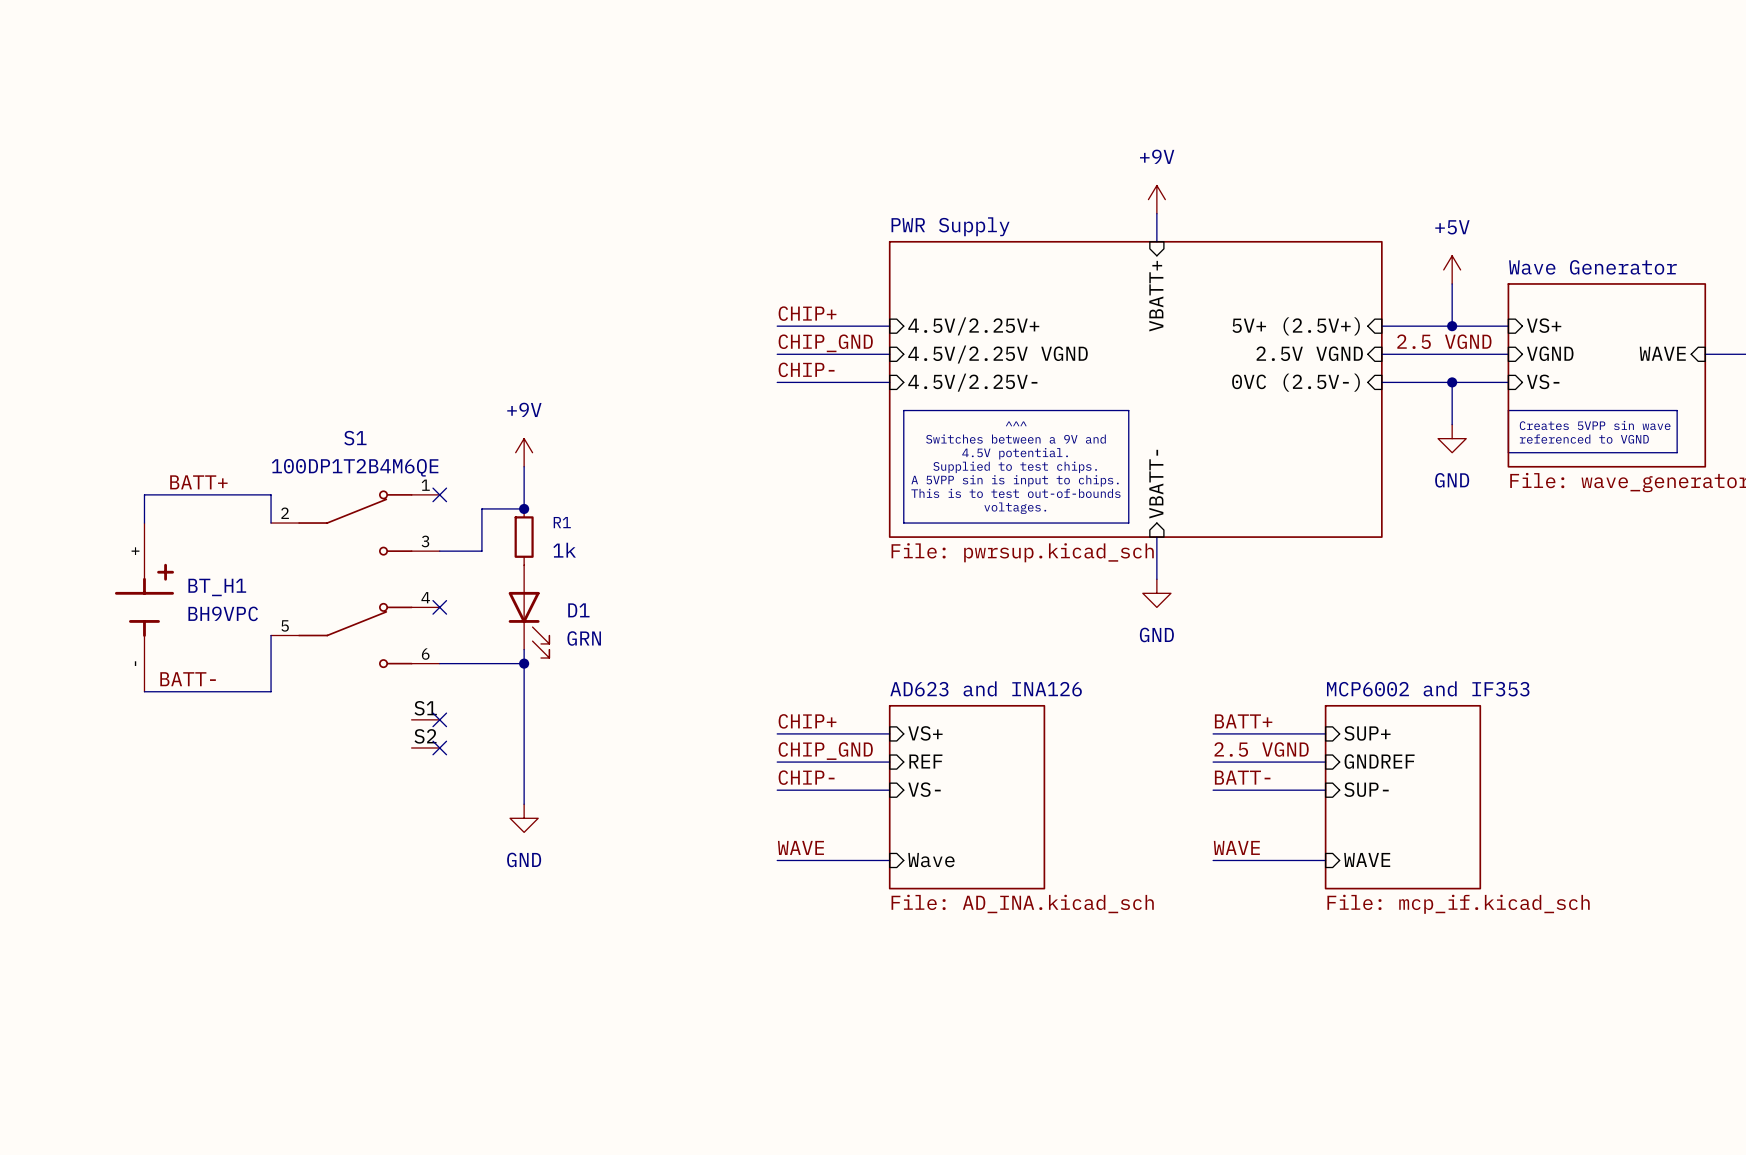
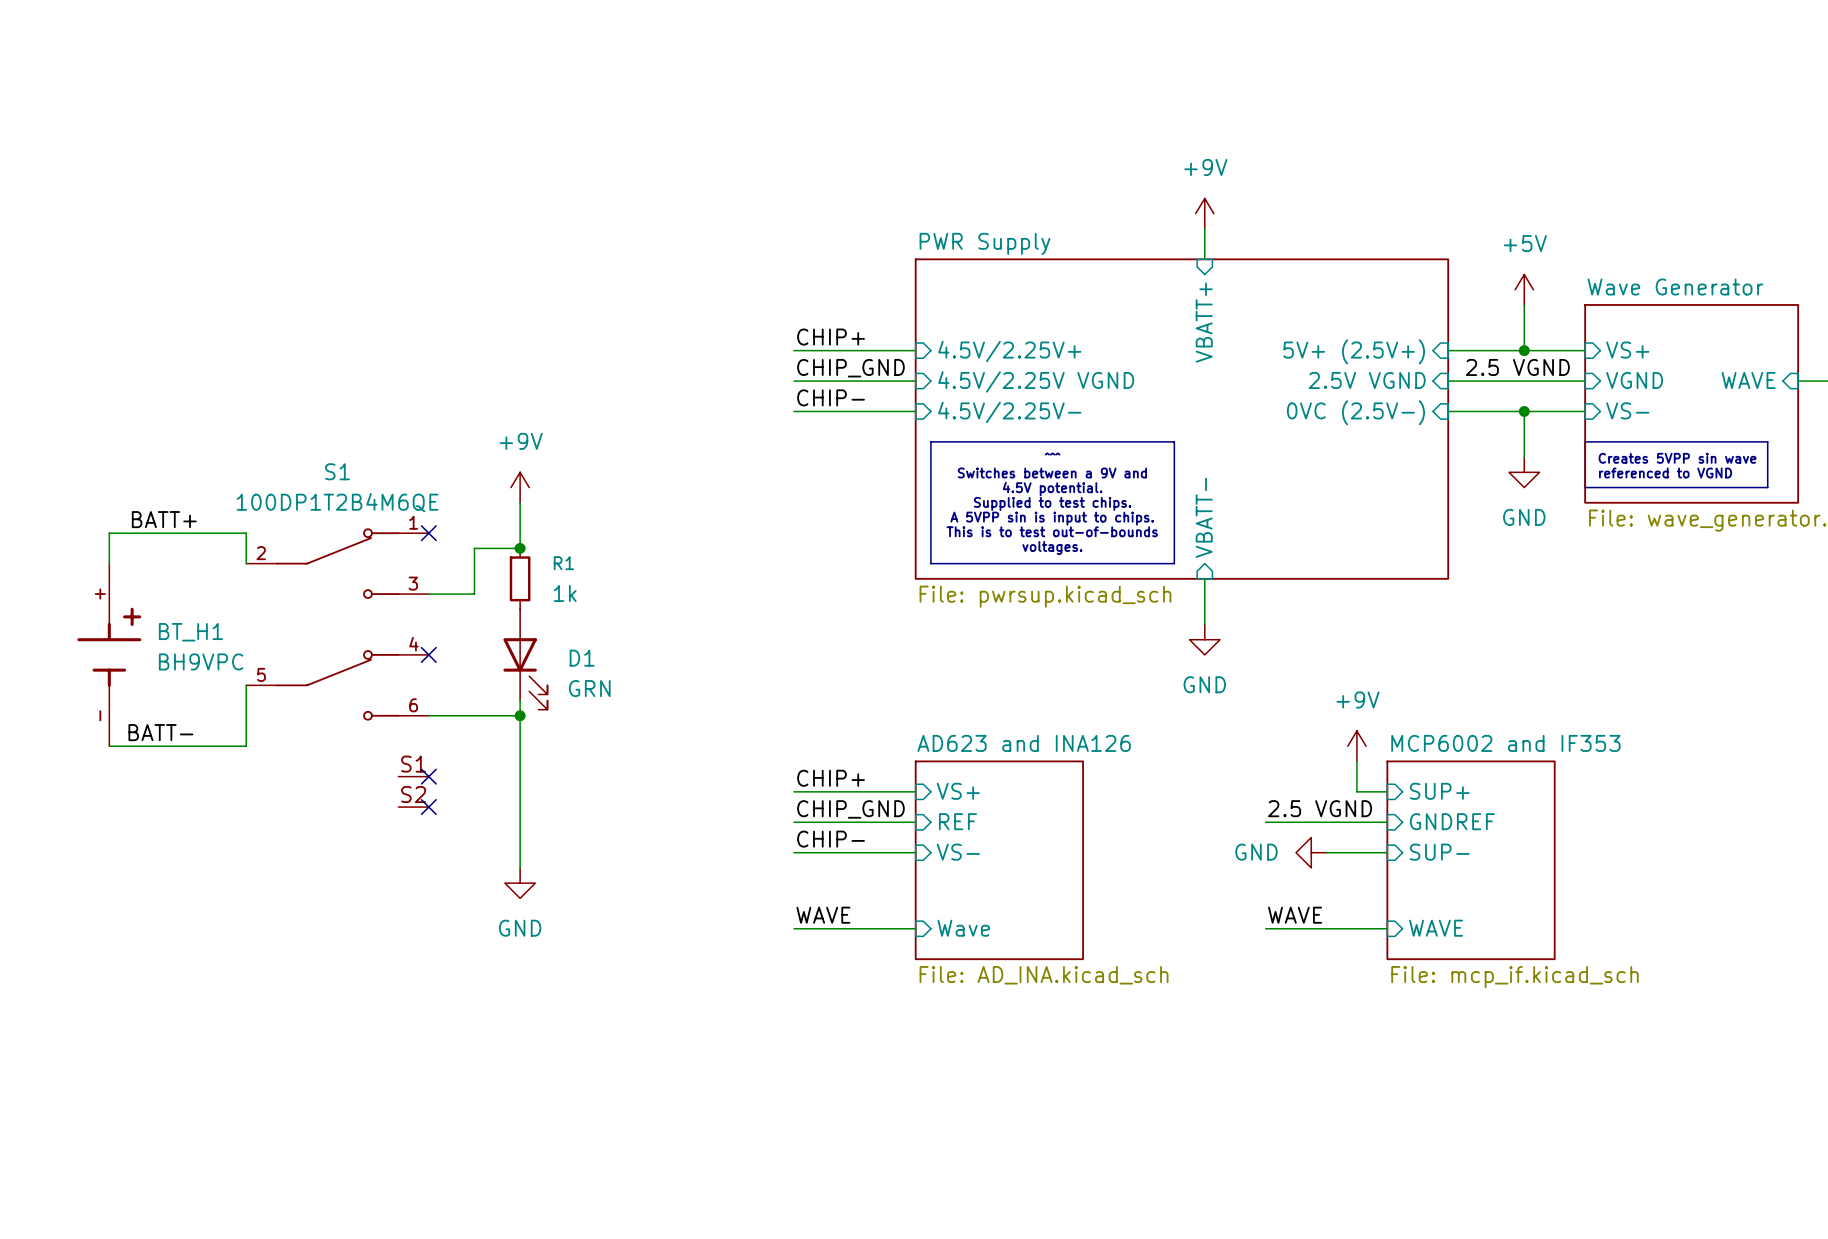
power symbol: none -> +9V (1356, 746)
label: BATT+ (1243, 721) -> none
wire: (1213, 733) (1297, 733) -> (1356, 761) (1356, 791)
label: BATT- (1242, 777) -> none
wire: (1213, 790) (1269, 790) -> none
power symbol: none -> GND (1311, 852)

